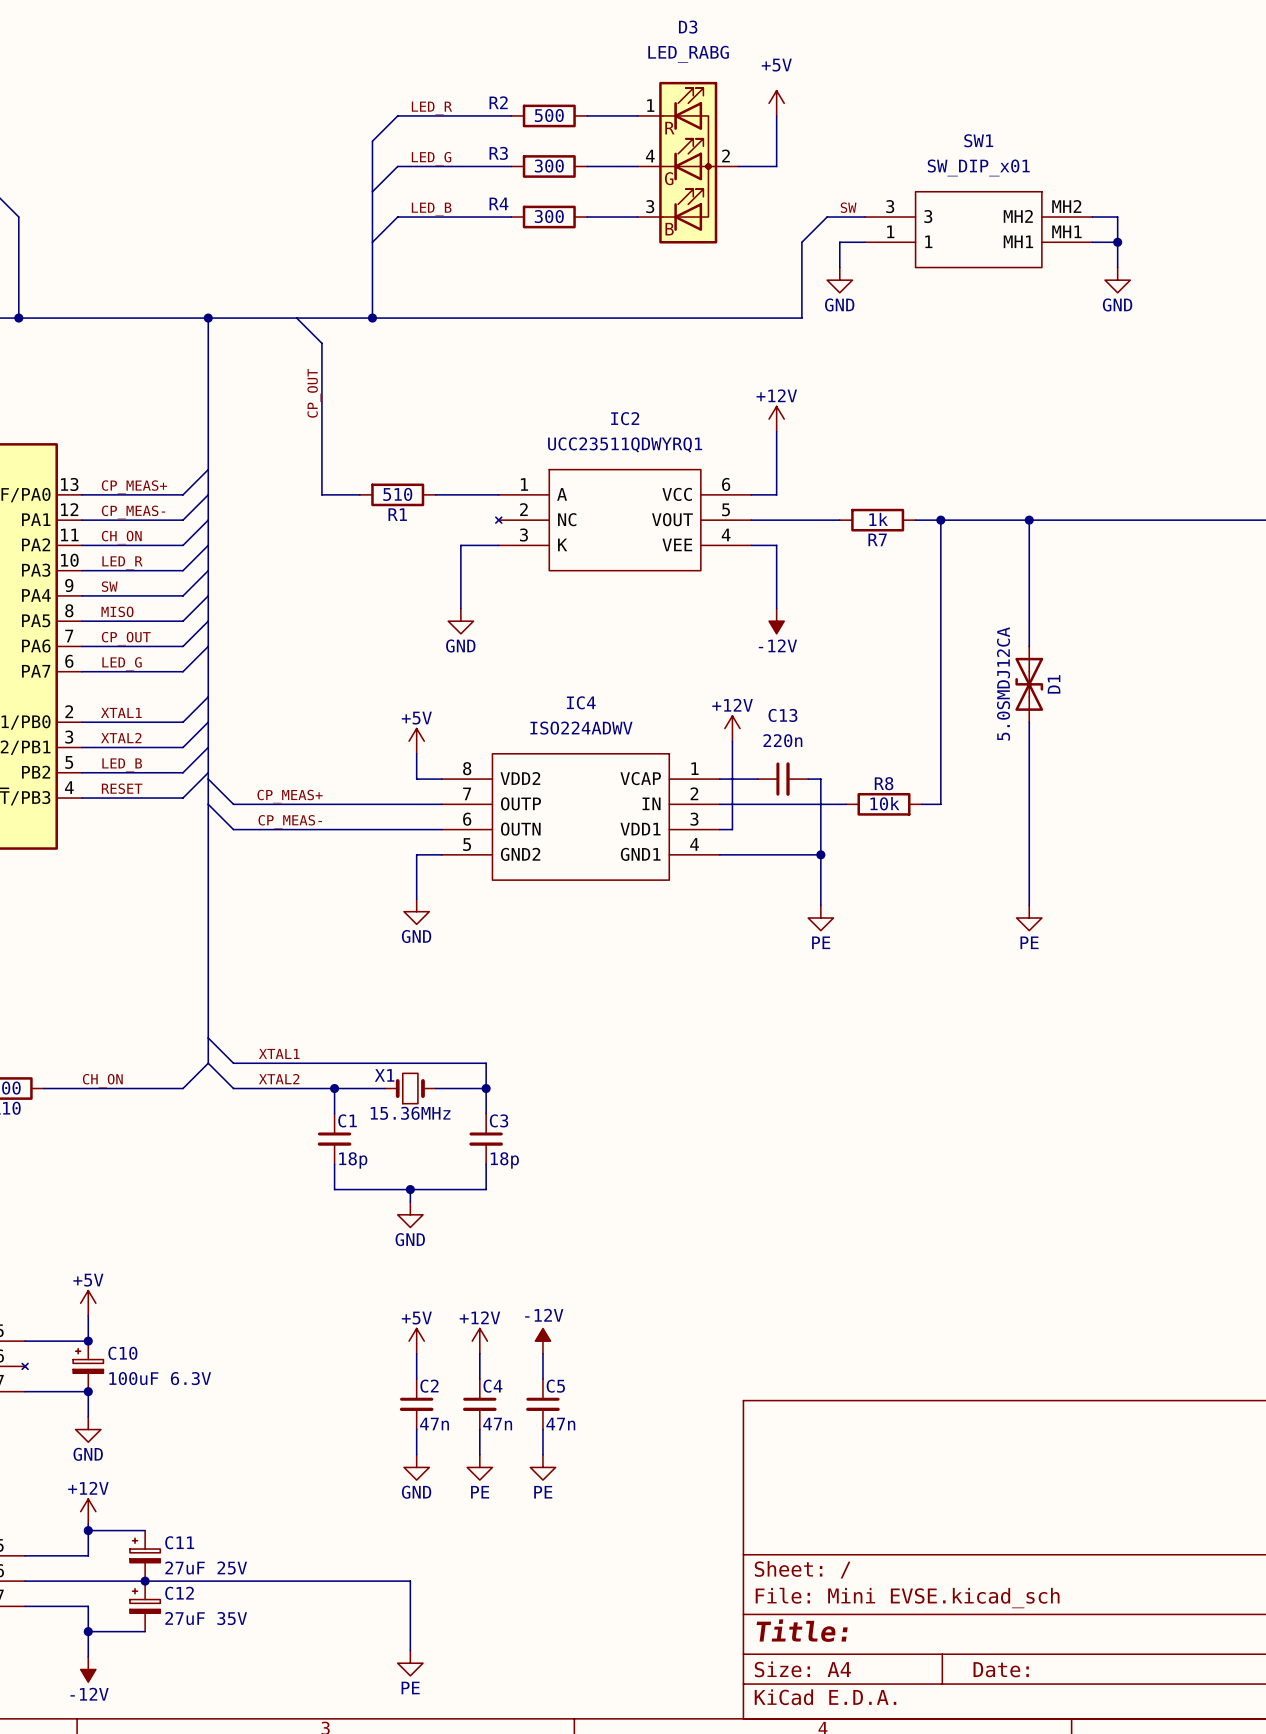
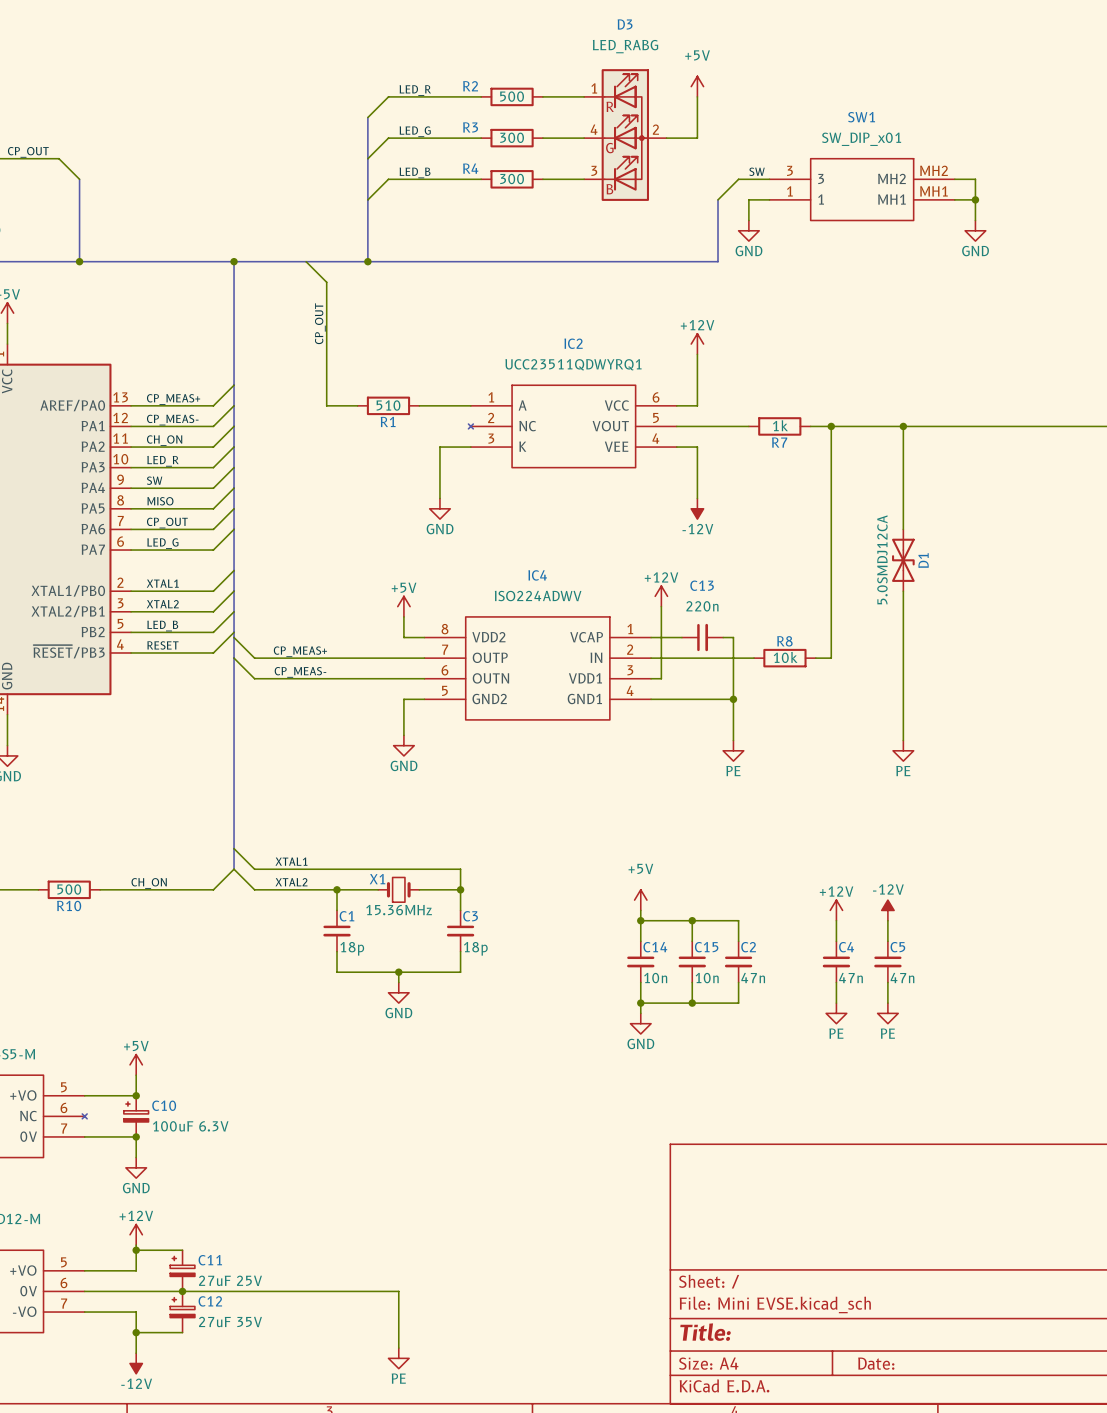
power symbol: none -> +5V (640, 900)
wire: none -> (640, 910) (640, 941)
power symbol: none -> +12V (836, 910)
power symbol: none -> -12V (887, 910)
wire: none -> (640, 920) (738, 920) (738, 941)
junction: none -> (640, 920)
wire: none -> (692, 920) (692, 941)
junction: none -> (692, 920)
wire: none -> (836, 920) (836, 941)
wire: none -> (887, 920) (887, 941)
C14: none -> 10n (640, 961)
C15: none -> 10n (692, 961)
wire: none -> (640, 982) (640, 1013)
wire: none -> (692, 982) (692, 1003)
wire: none -> (738, 982) (738, 1003) (640, 1003)
wire: none -> (836, 982) (836, 1003)
wire: none -> (887, 982) (887, 1003)
junction: none -> (640, 1003)
junction: none -> (692, 1003)
power symbol: none -> PE (836, 1013)
power symbol: none -> PE (887, 1013)
power symbol: none -> GND (640, 1023)
power symbol: +5V (416, 1341) -> none
power symbol: +12V (479, 1341) -> none
power symbol: -12V (542, 1341) -> none
wire: (416, 1353) (416, 1379) -> none
wire: (479, 1353) (479, 1379) -> none
wire: (542, 1353) (542, 1379) -> none
C2 position: (416, 1404) -> (738, 961)
C4 position: (479, 1404) -> (836, 961)
C5 position: (542, 1404) -> (887, 961)
wire: (416, 1429) (416, 1454) -> none
wire: (479, 1429) (479, 1454) -> none
wire: (542, 1429) (542, 1454) -> none
power symbol: GND (416, 1467) -> none
power symbol: PE (479, 1467) -> none
power symbol: PE (542, 1467) -> none

